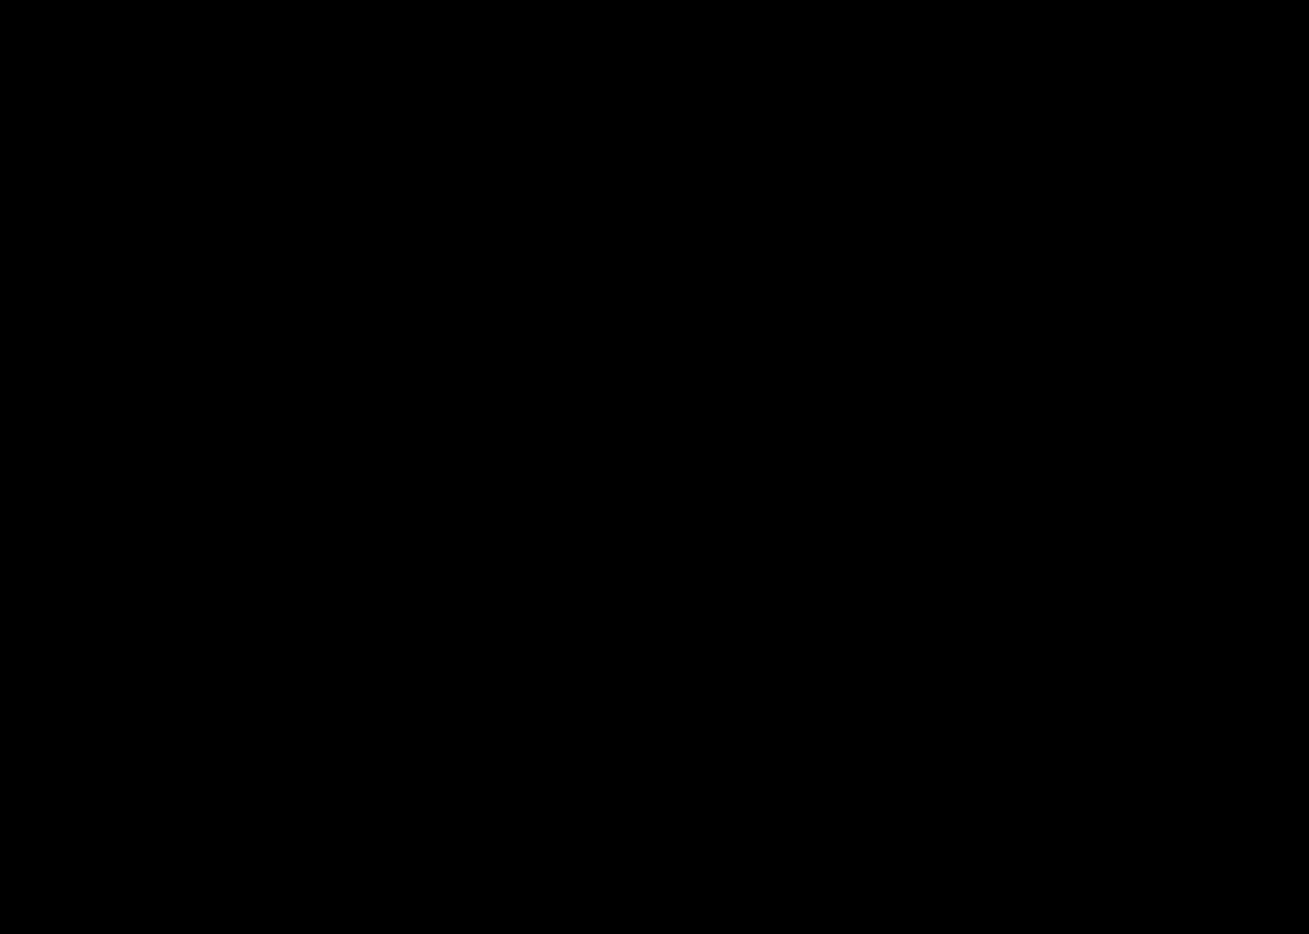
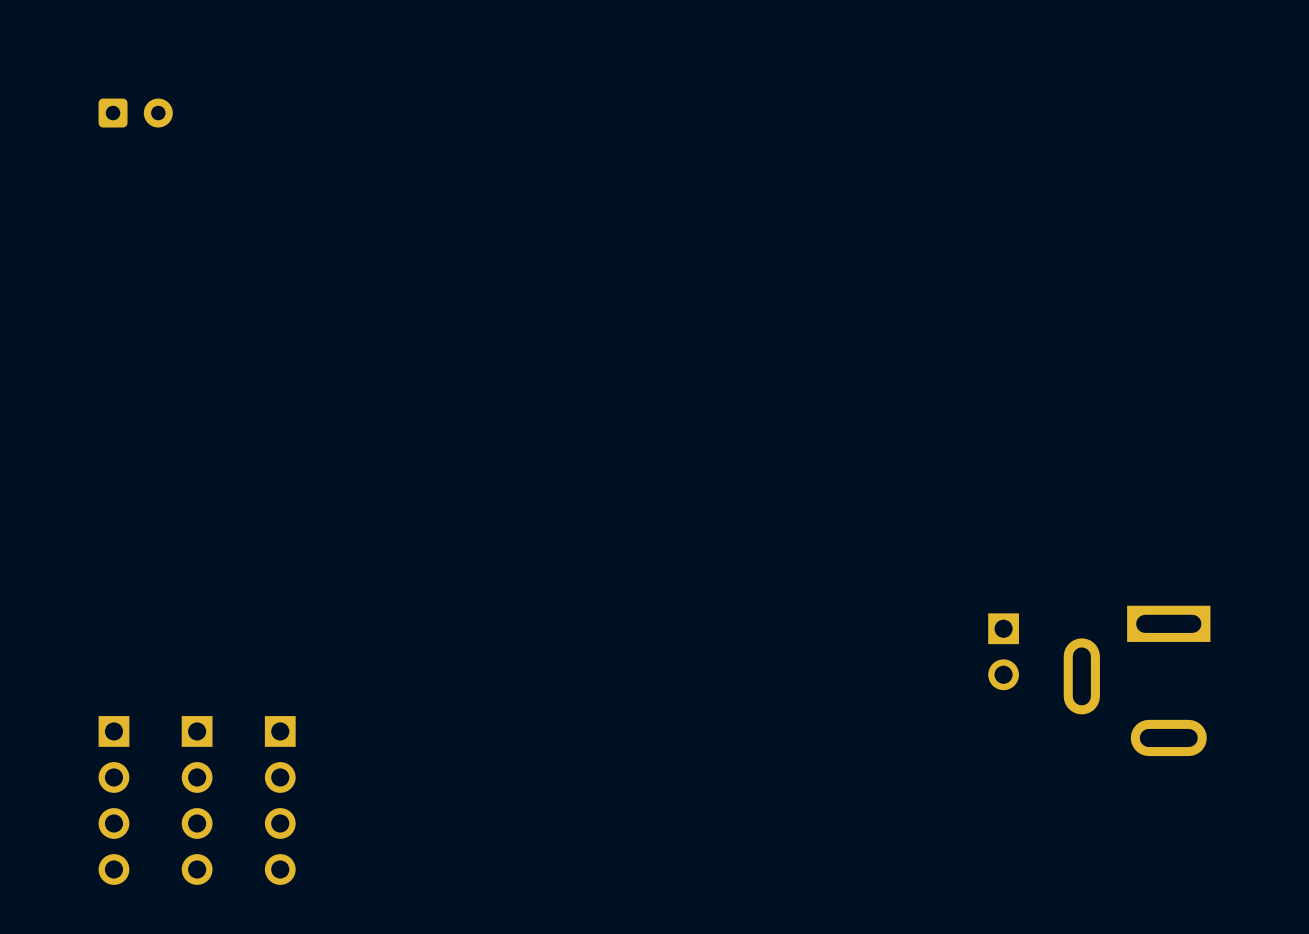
part: none -> (135, 113)
part: none -> (1003, 651)
part: none -> (1137, 680)
part: none -> (113, 800)
part: none -> (197, 800)
part: none -> (280, 800)

